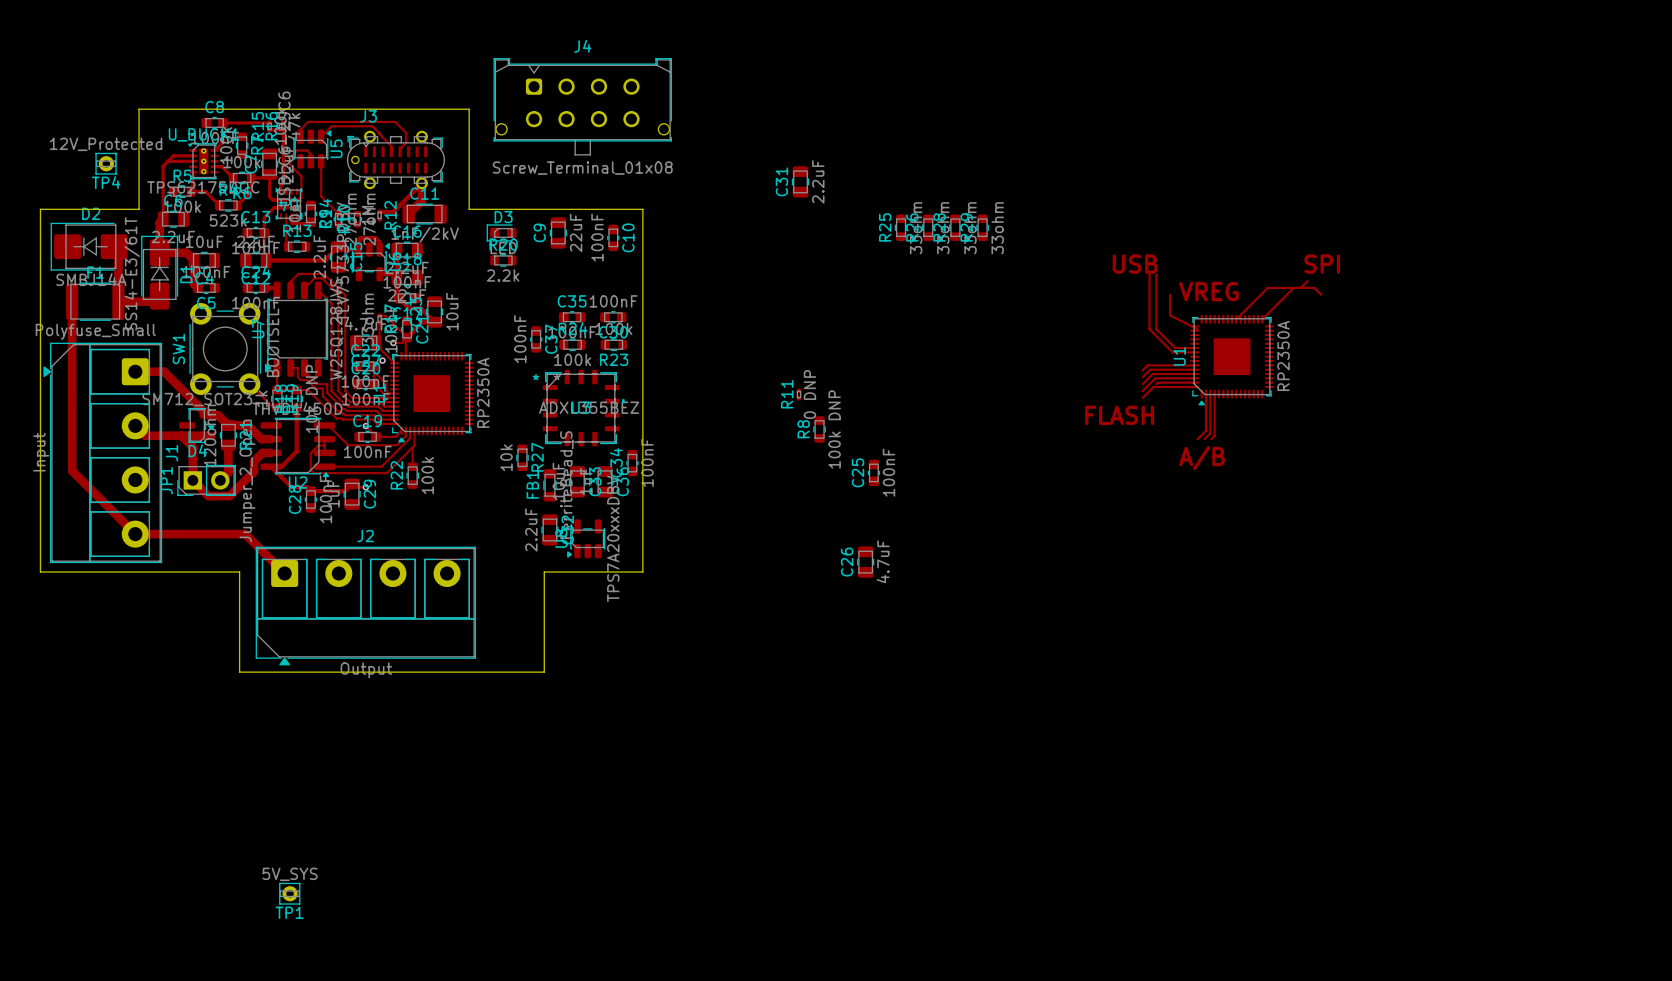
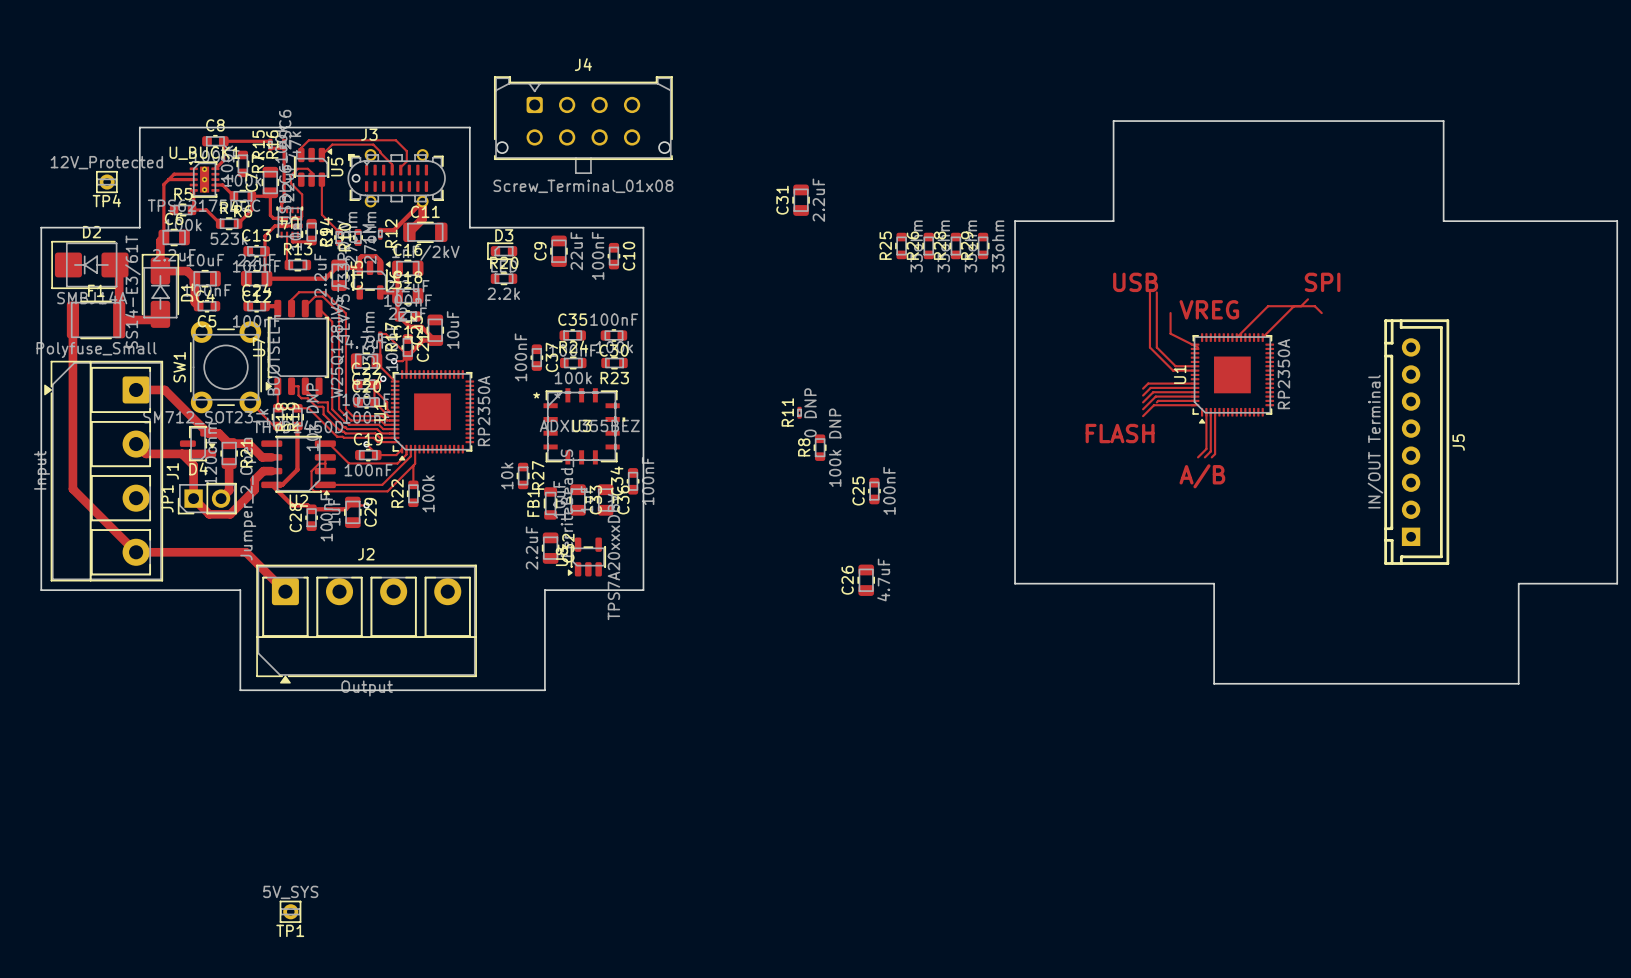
board edge: none -> (1113, 121) (1113, 221) (1015, 221) (1015, 583) (1214, 583) (1214, 683) (1518, 683) (1518, 583) (1617, 583) (1617, 221) (1443, 221) (1443, 121) (1113, 121)
J5: none -> IN/OUT Terminal (1416, 442)

